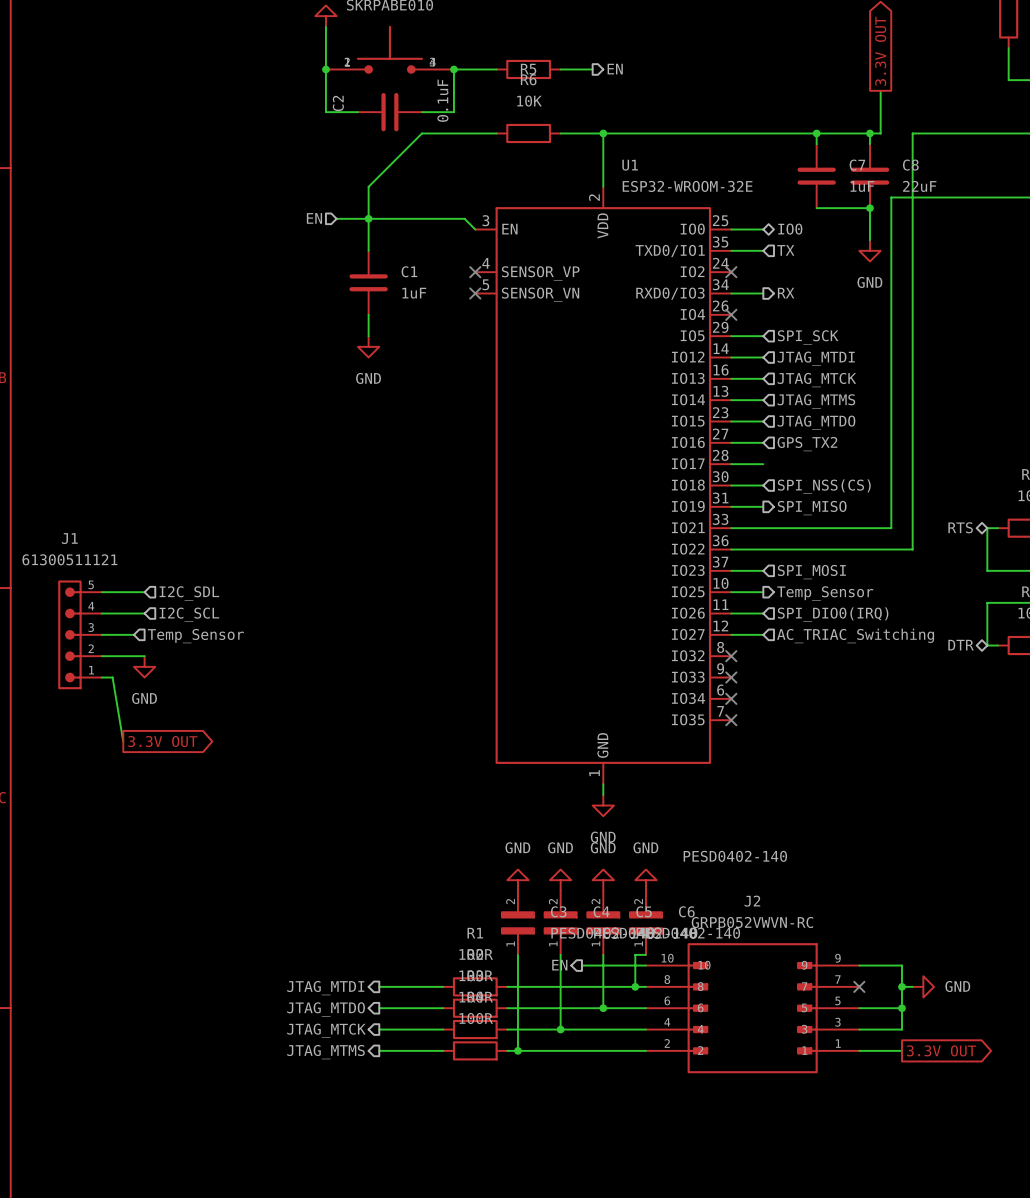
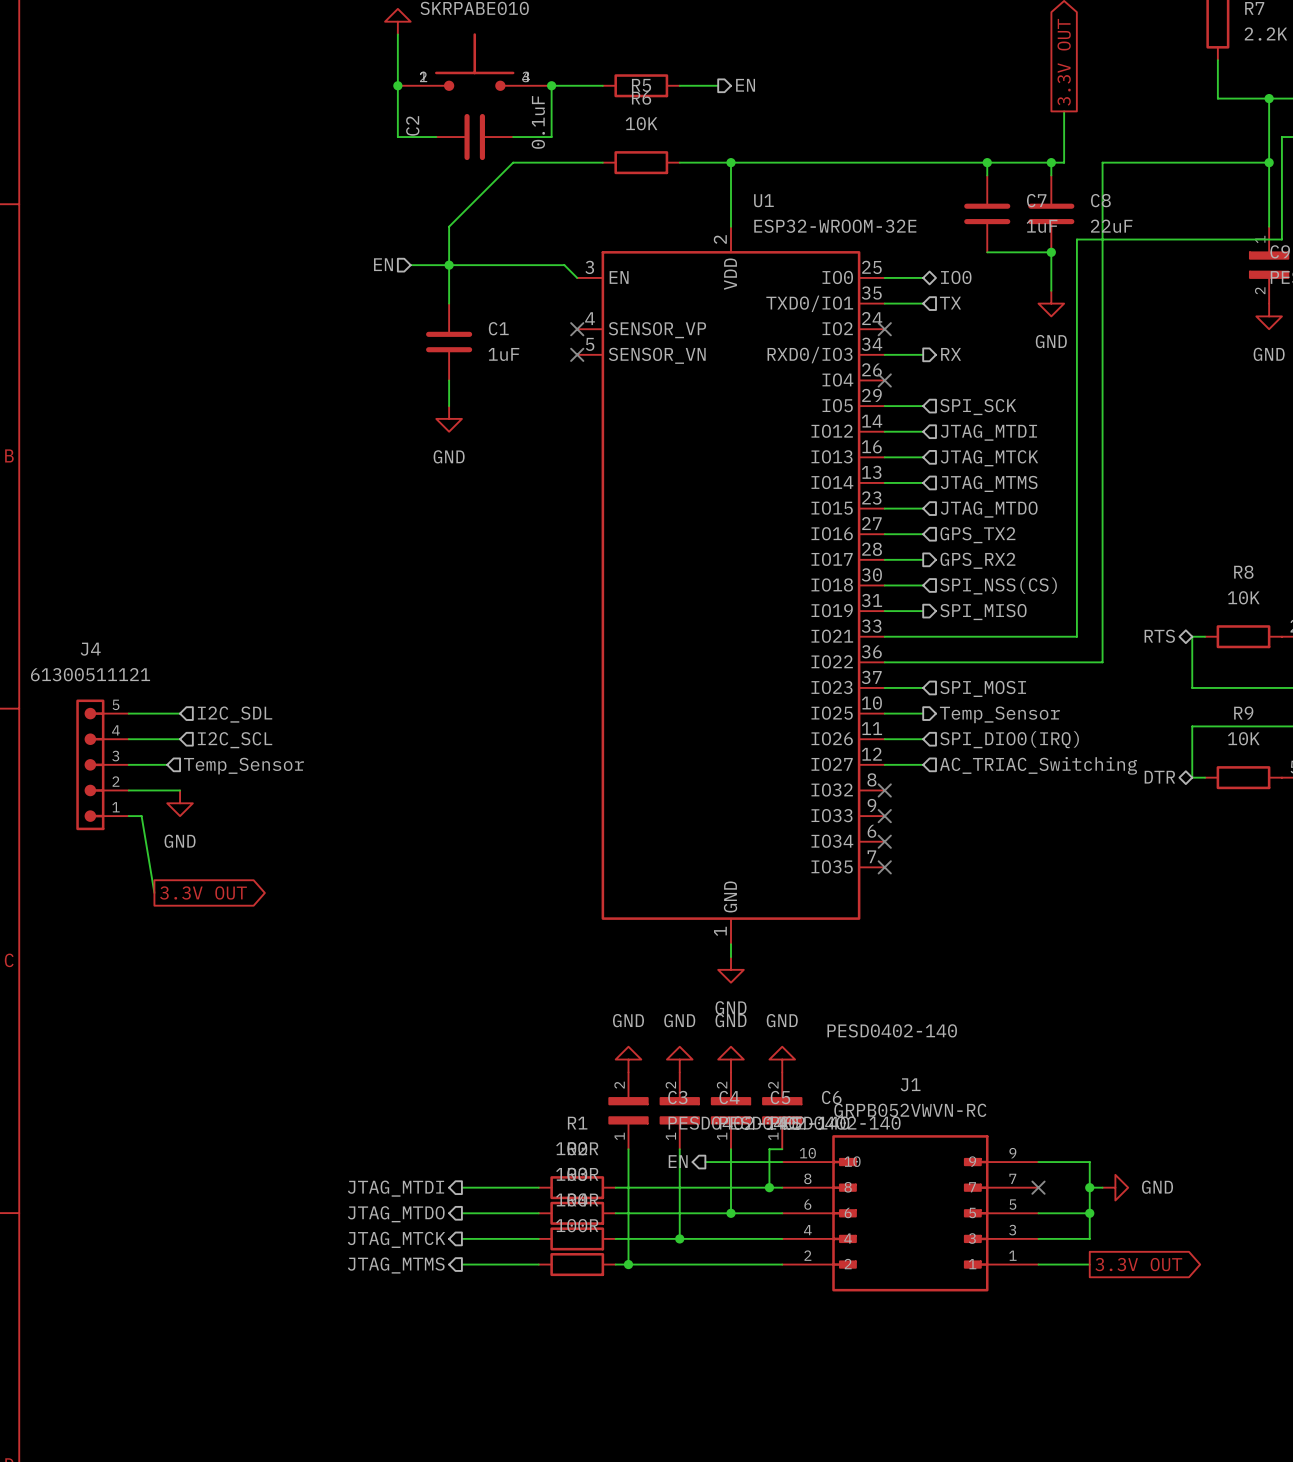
hierarchical label: none -> GPS_RX2 (977, 560)
J1 name: J1 (69, 538) -> J4 (90, 649)
J2 name: J2 (752, 901) -> J1 (910, 1084)

